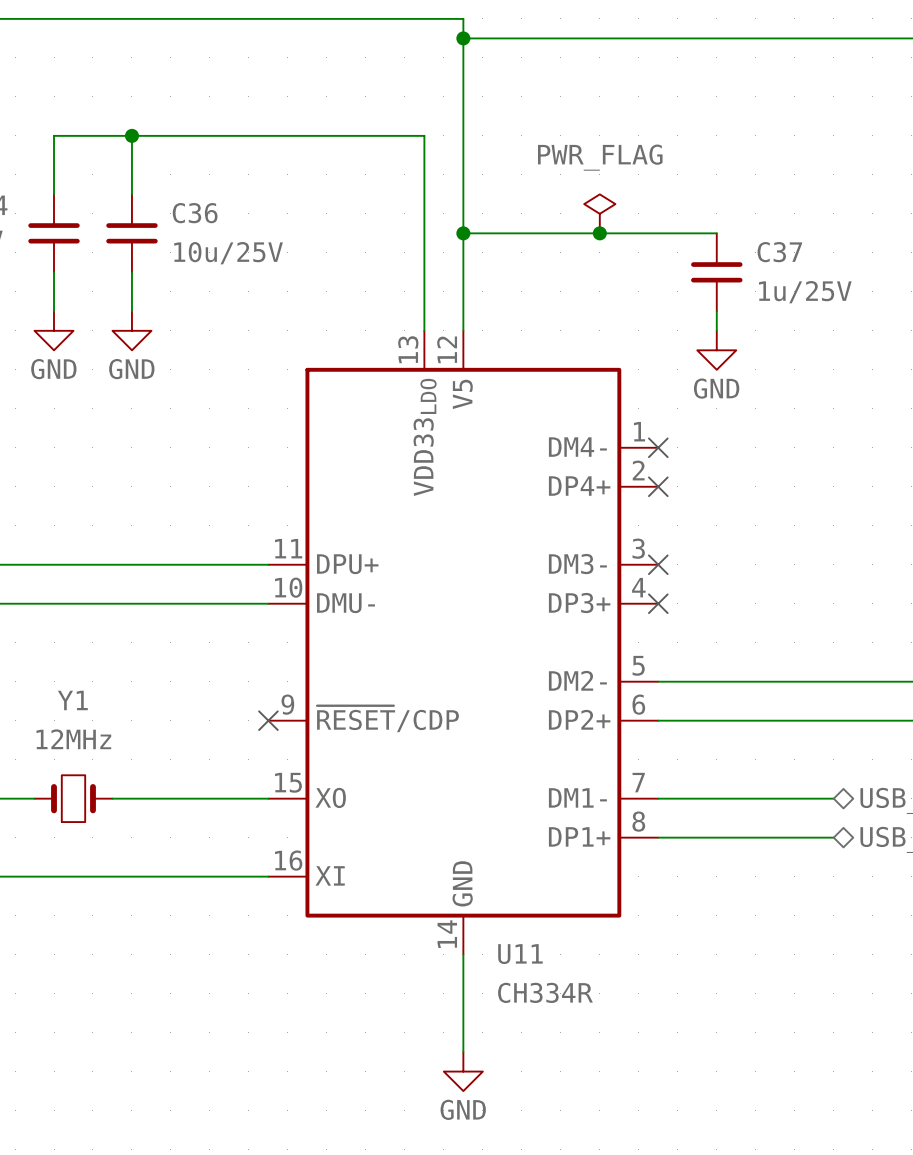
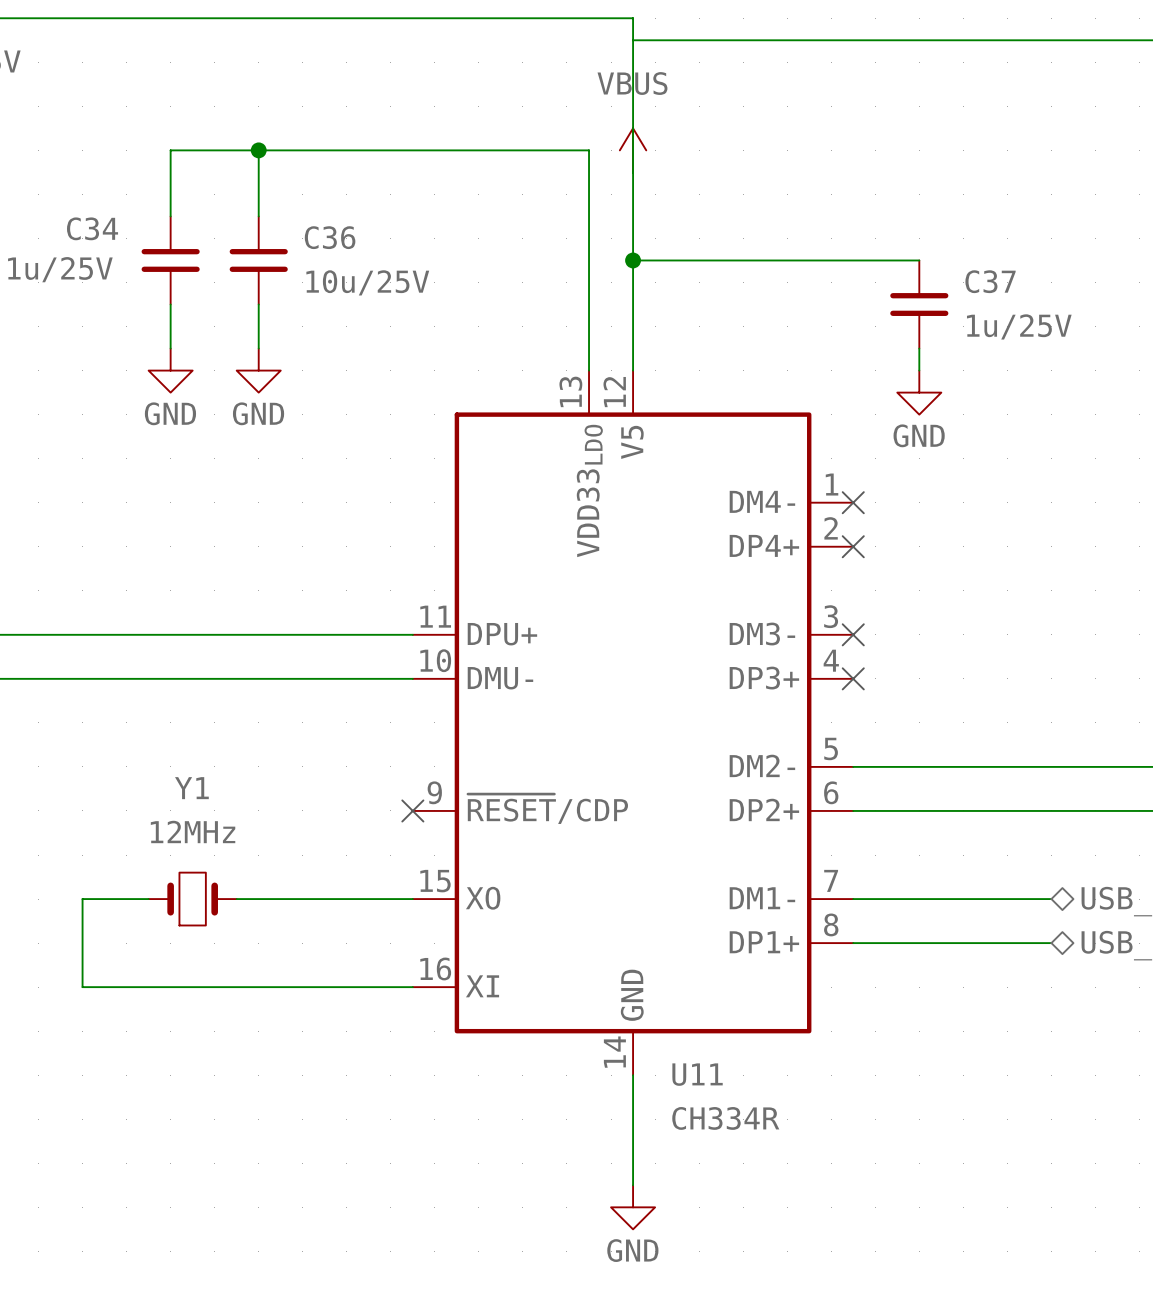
junction: (463, 38) -> none
power symbol: none -> VBUS (633, 150)
power symbol: PWR_FLAG (599, 213) -> none
junction: (599, 233) -> none

